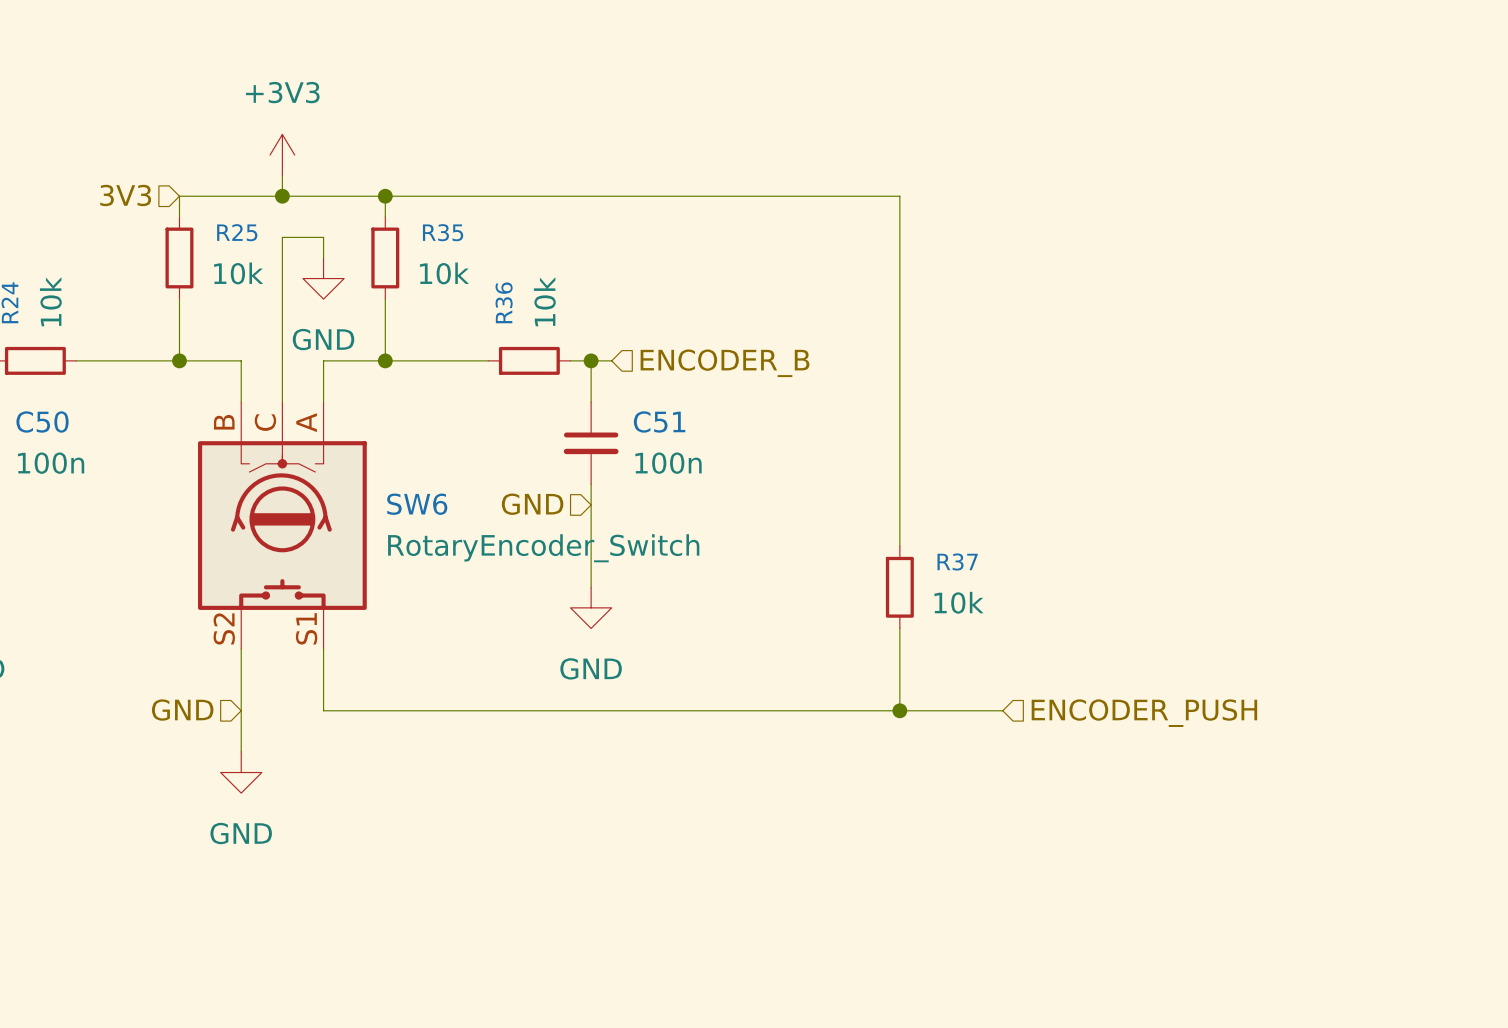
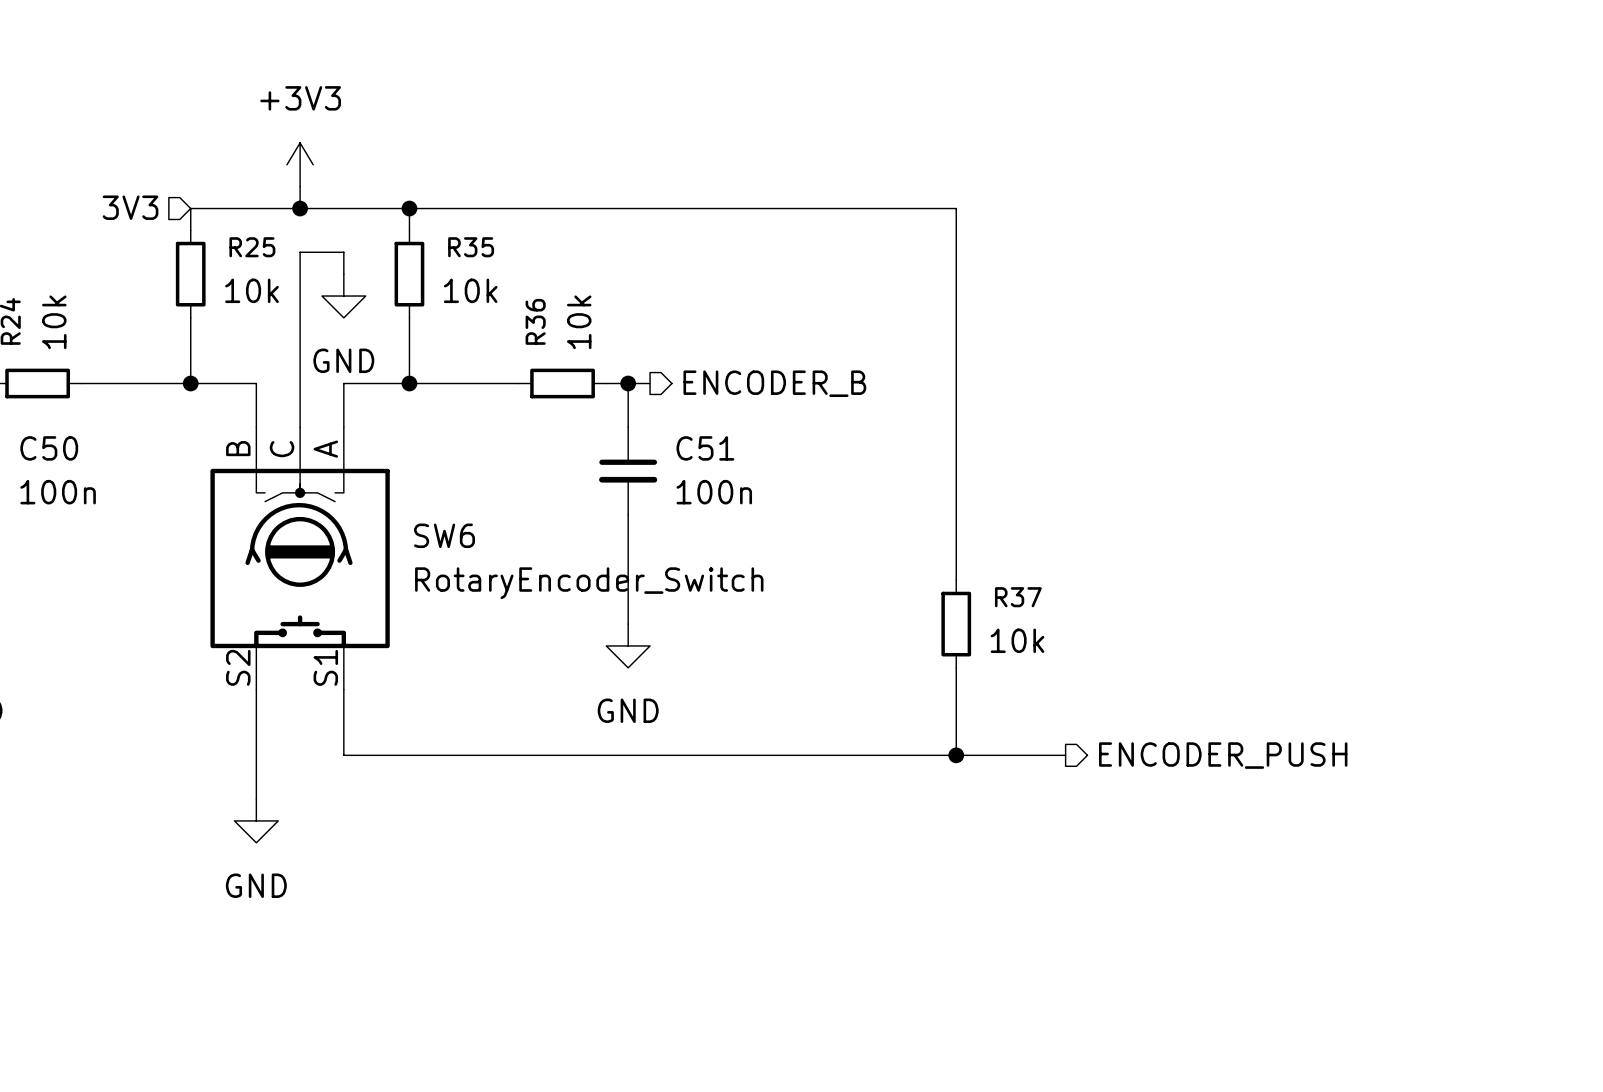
hierarchical label shape: input (725, 363) -> output (774, 383)
hierarchical label: GND (532, 504) -> none
hierarchical label: GND (182, 710) -> none
hierarchical label shape: input (1144, 713) -> output (1223, 755)

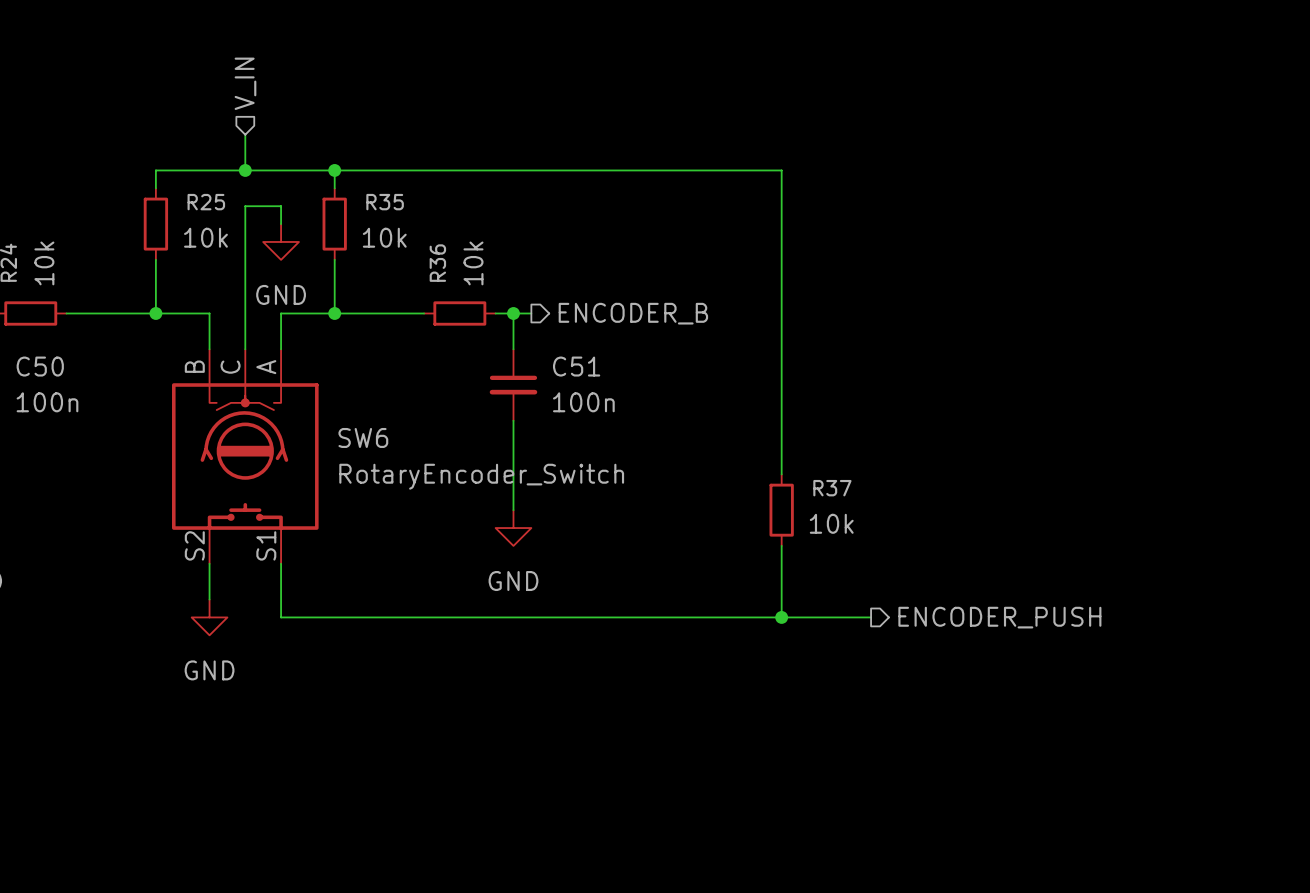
hierarchical label: none -> V_IN (245, 83)
power symbol: +3V3 (300, 164) -> none
hierarchical label: 3V3 (130, 207) -> none
wire: (256, 733) (256, 799) -> none
power symbol position: GND (256, 820) -> GND (209, 617)

